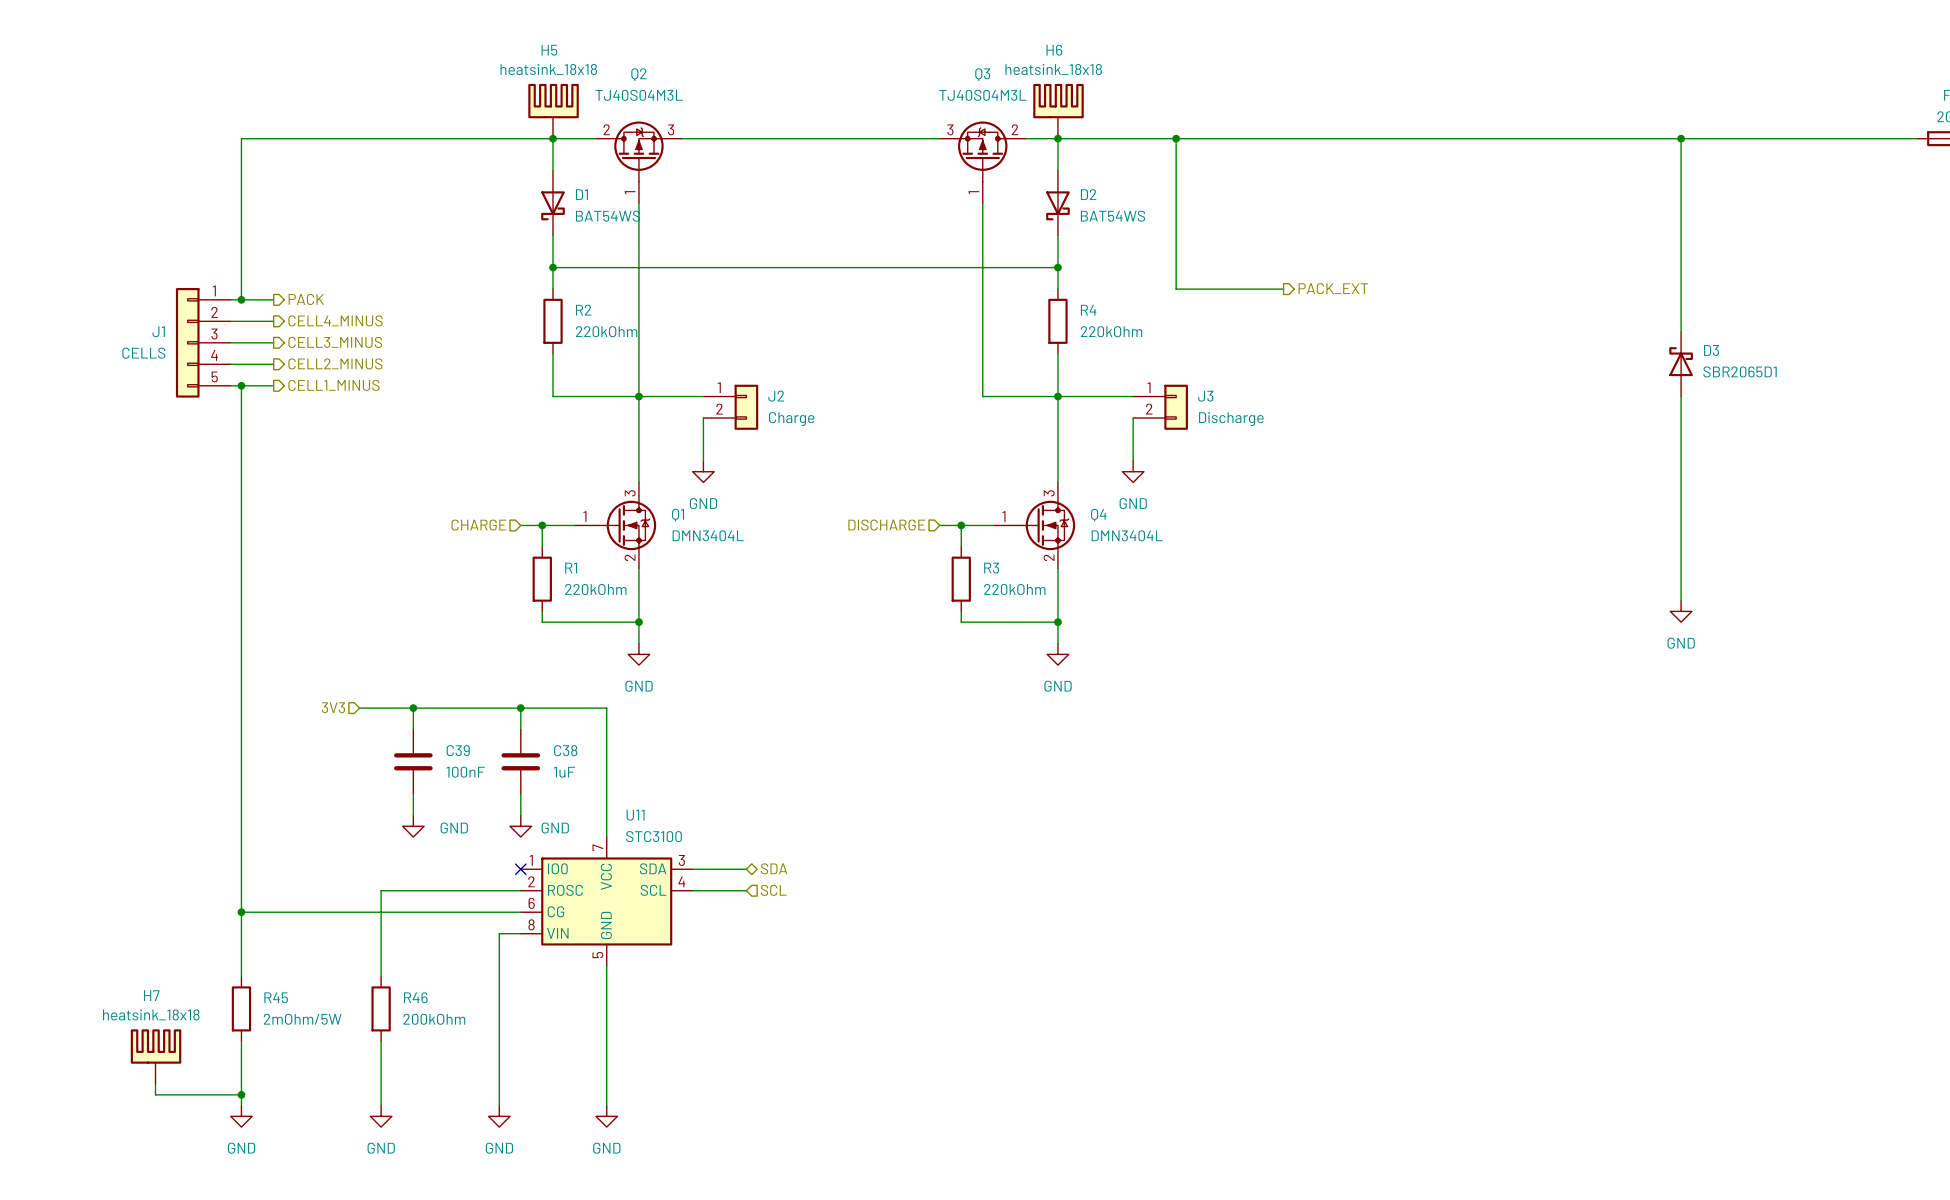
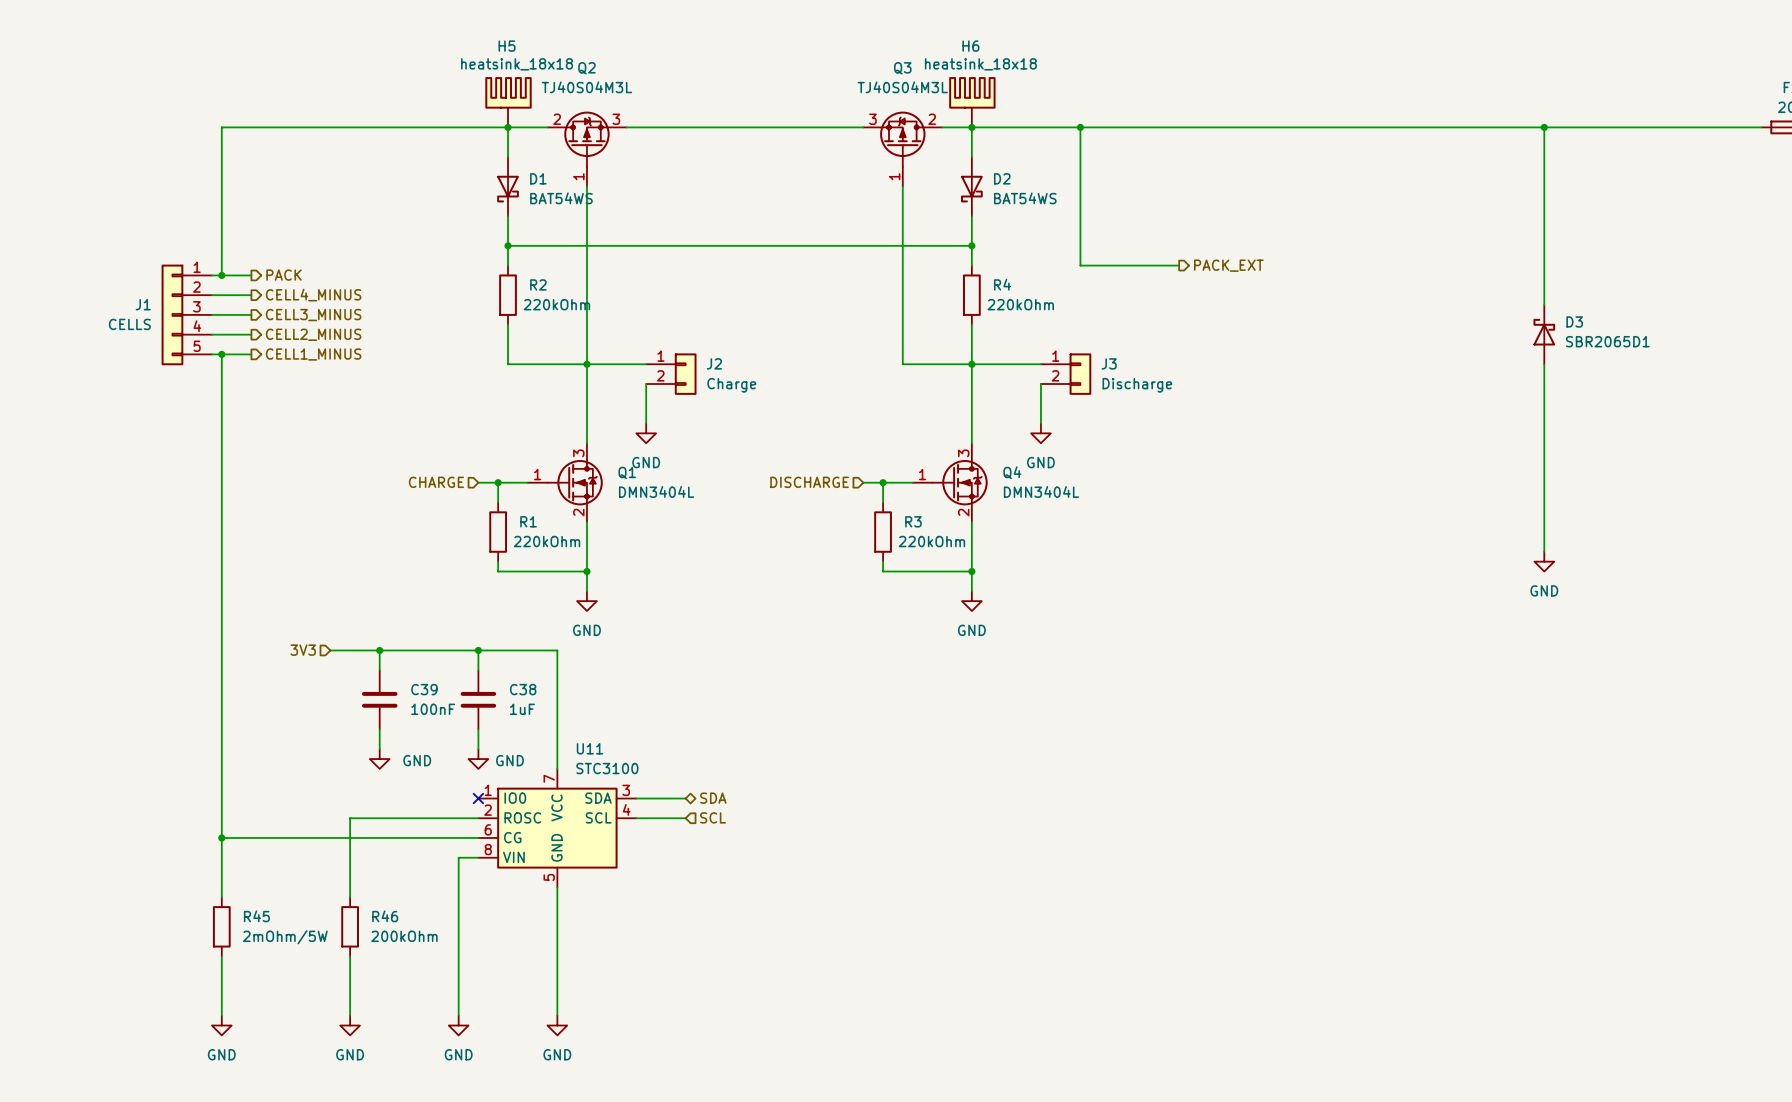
H7: heatsink_18x18 (156, 1056) -> none
wire: (155, 1084) (155, 1094) (241, 1094) -> none
junction: (241, 1094) -> none

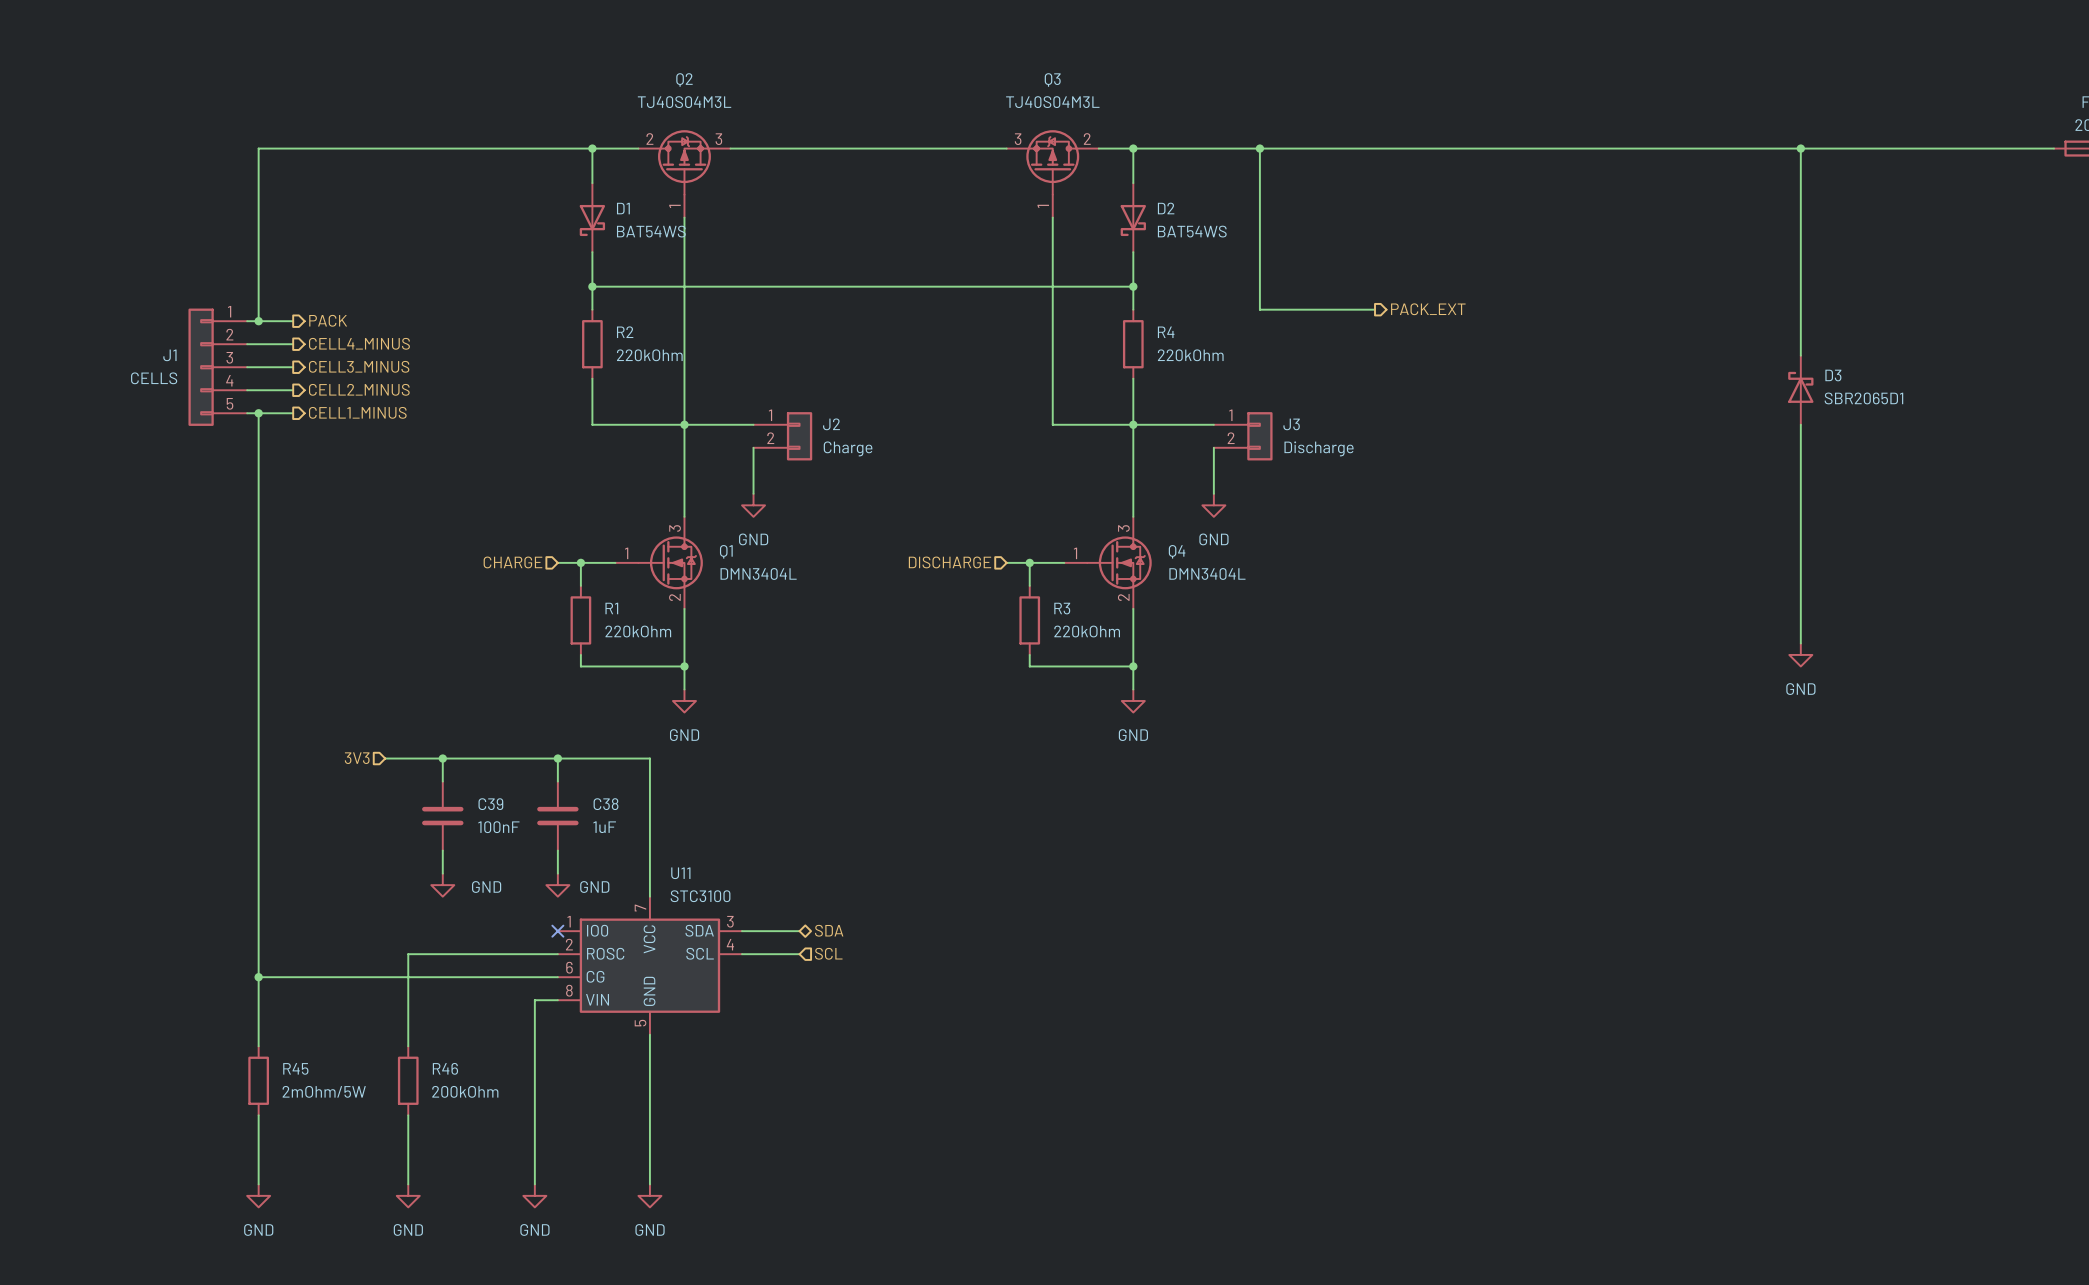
H5: heatsink_18x18 (508, 102) -> none
H6: heatsink_18x18 (972, 102) -> none

